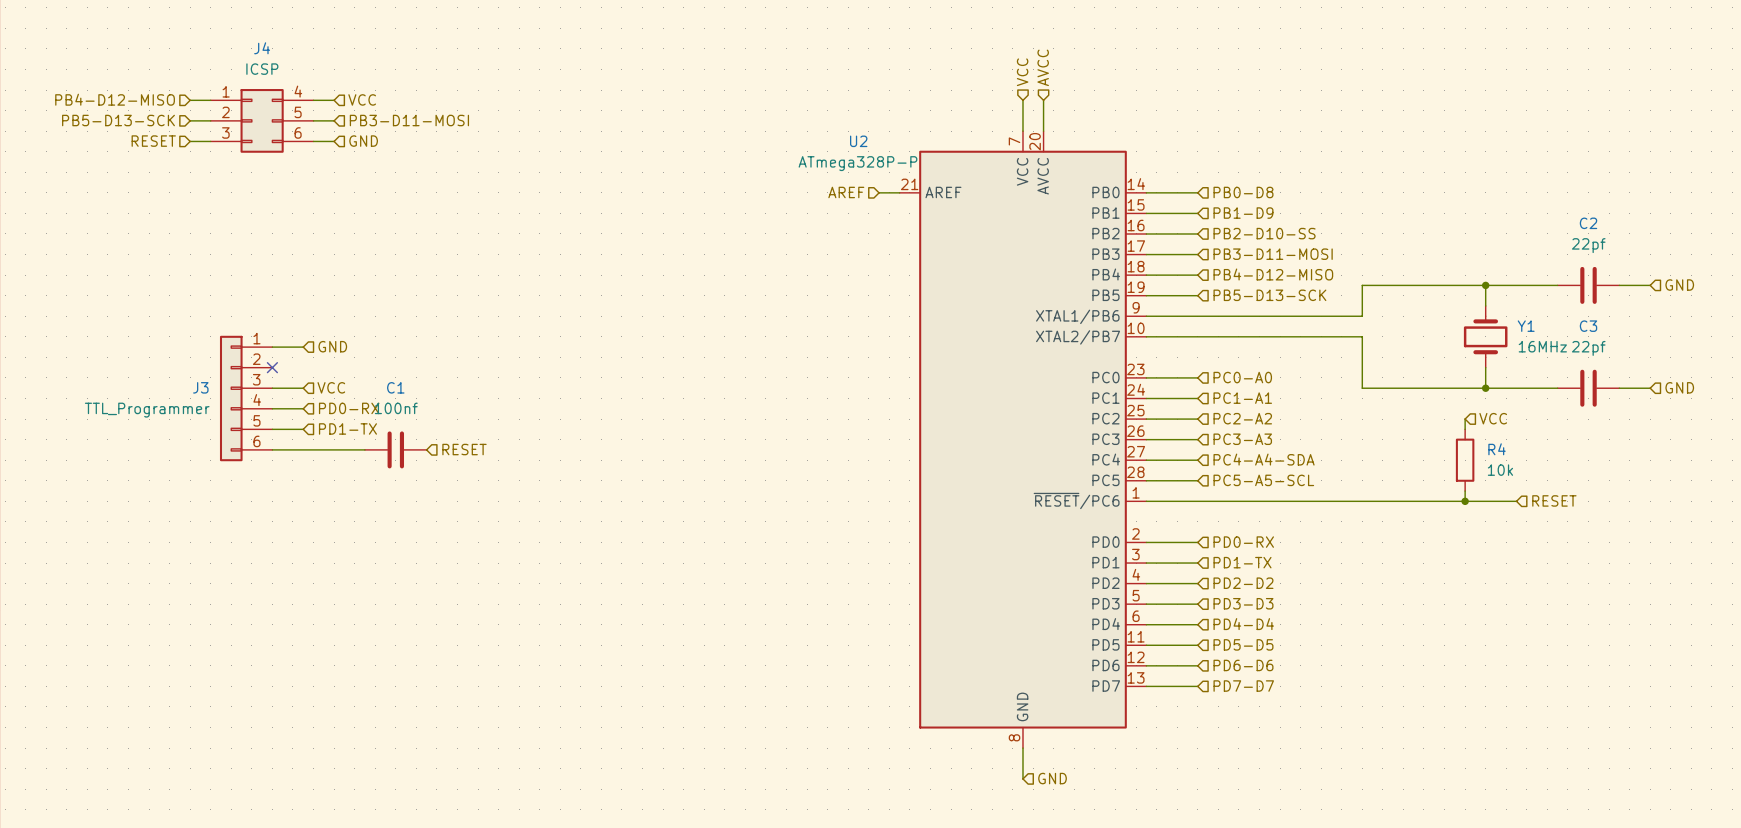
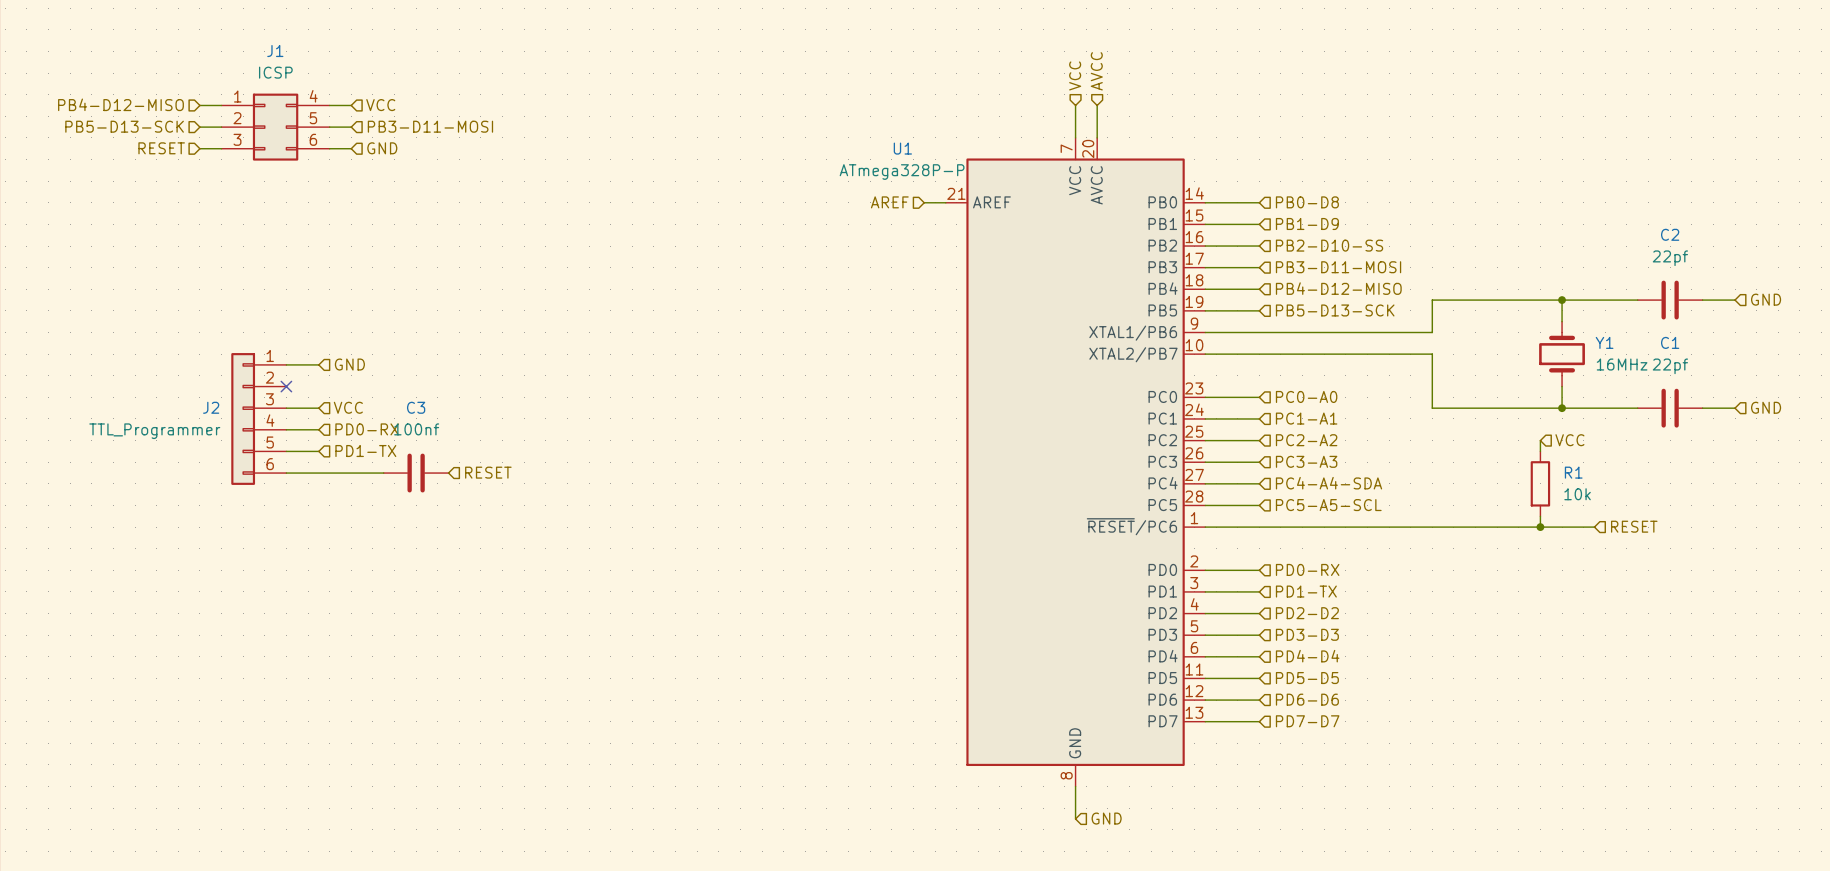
J4 name: J4 (262, 48) -> J1 (275, 51)
U2 name: U2 (858, 141) -> U1 (902, 148)
C3 name: C3 (1588, 326) -> C1 (1670, 342)
J3 name: J3 (200, 387) -> J2 (211, 407)
C1 name: C1 (395, 387) -> C3 (416, 407)
R4 name: R4 (1497, 449) -> R1 (1573, 472)

